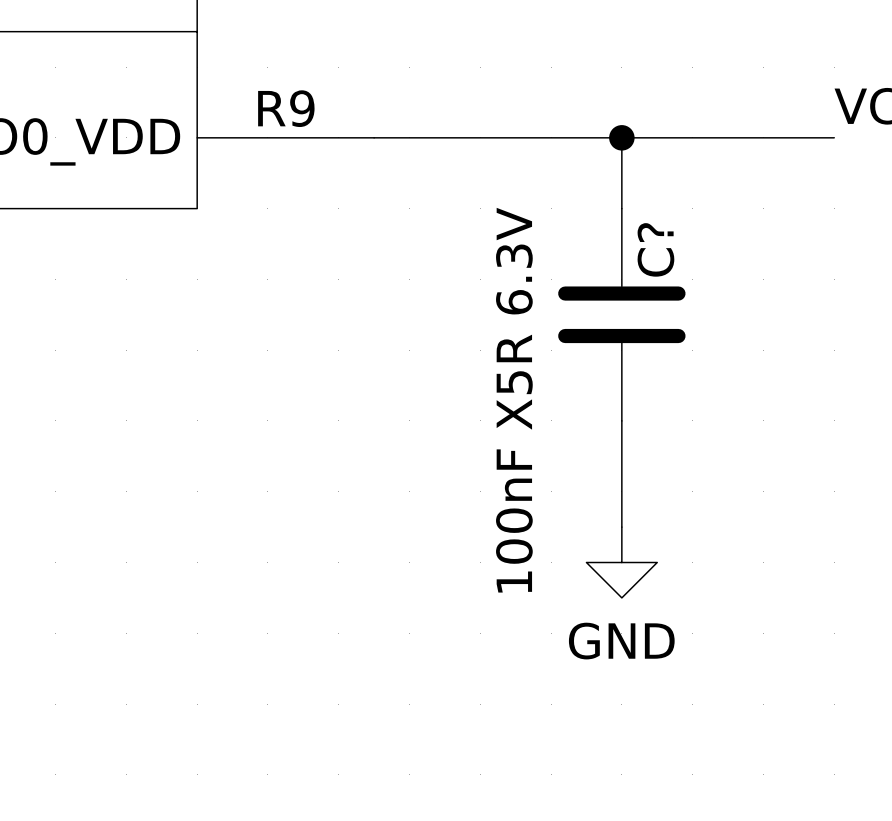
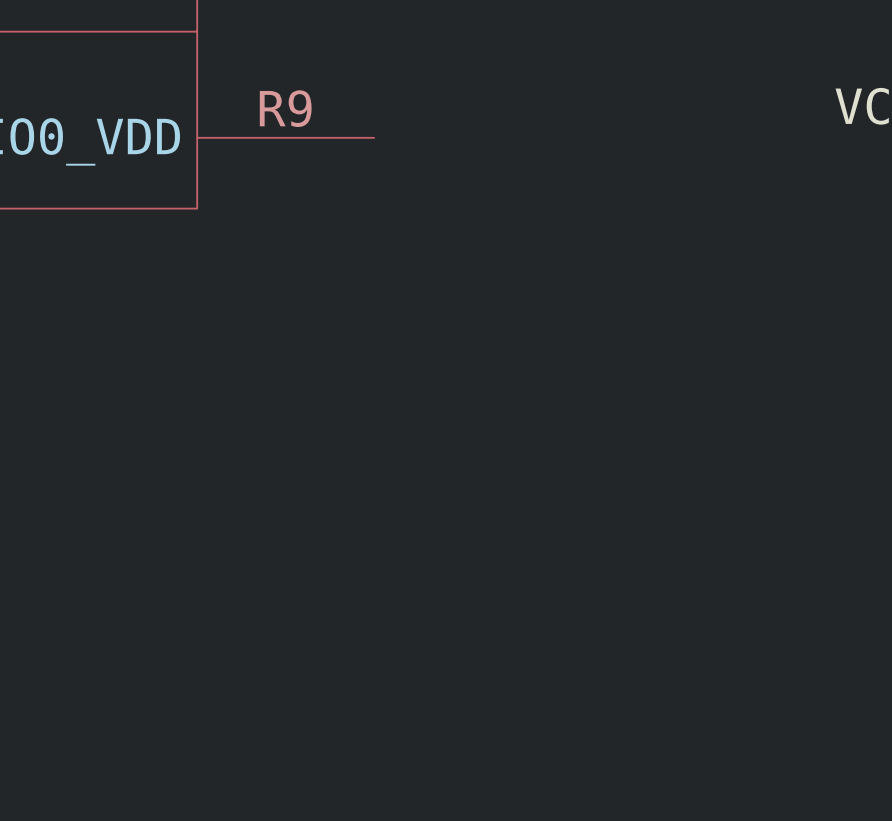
wire: (374, 137) (834, 137) -> none
wire: (621, 137) (621, 208) -> none
junction: (621, 137) -> none
C?: 100nF X5R 6.3V (621, 314) -> none
wire: (621, 420) (621, 527) -> none
power symbol: GND (621, 562) -> none

